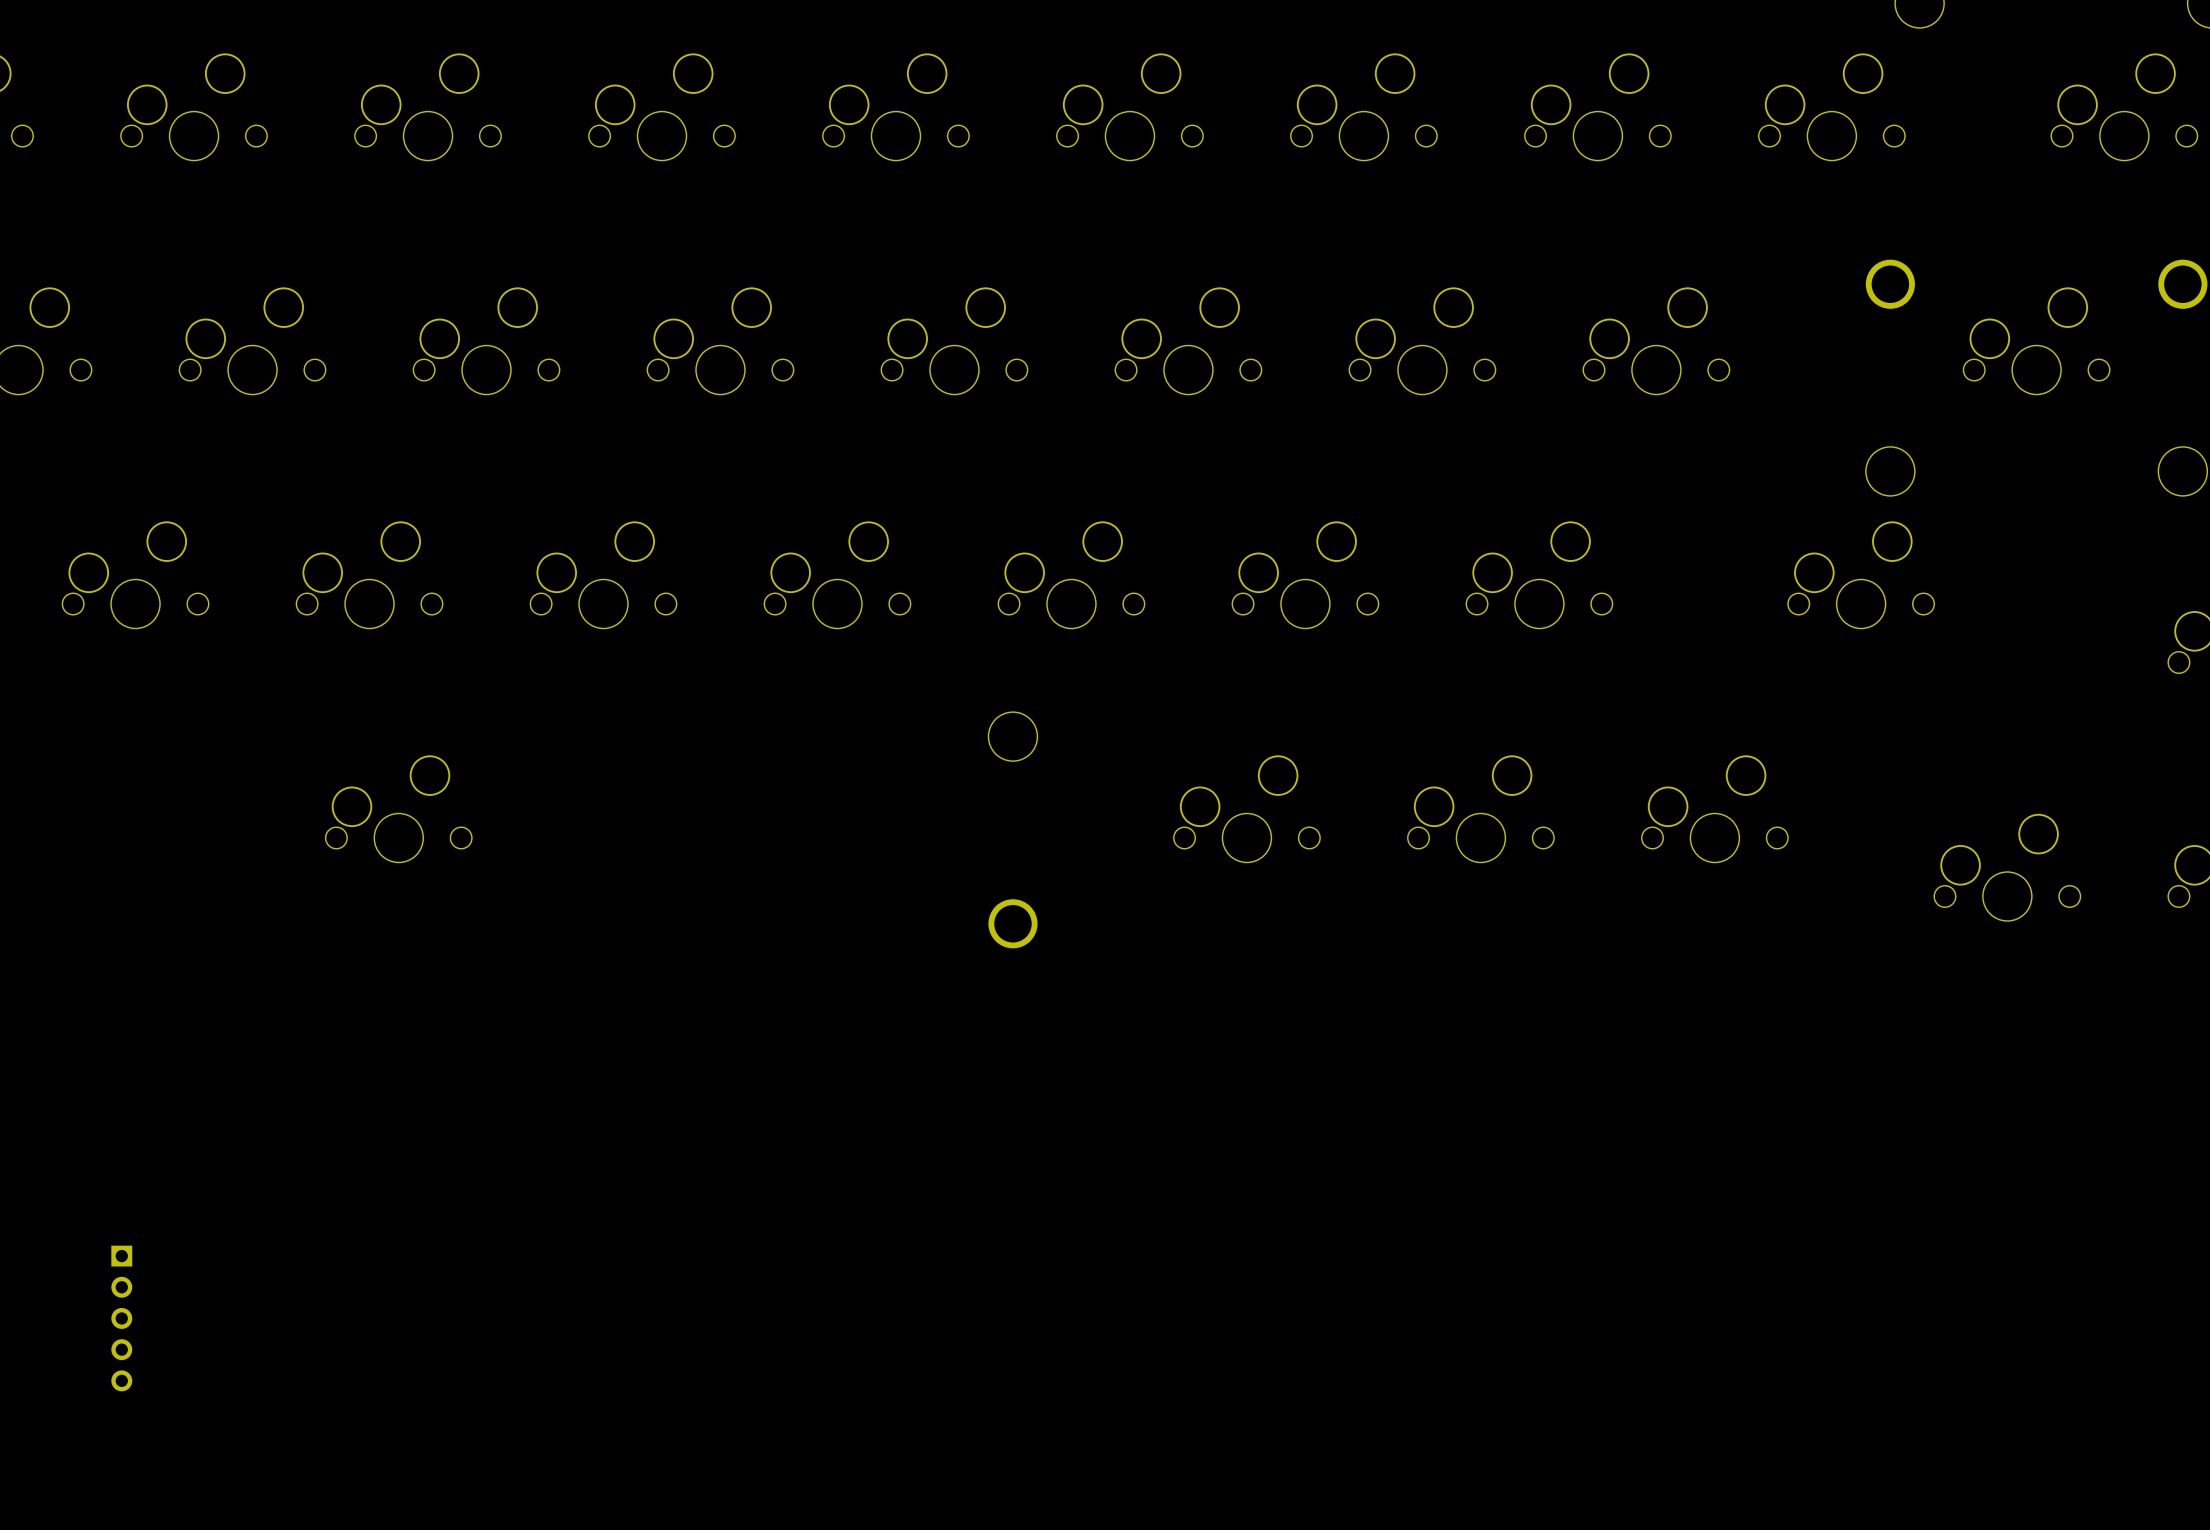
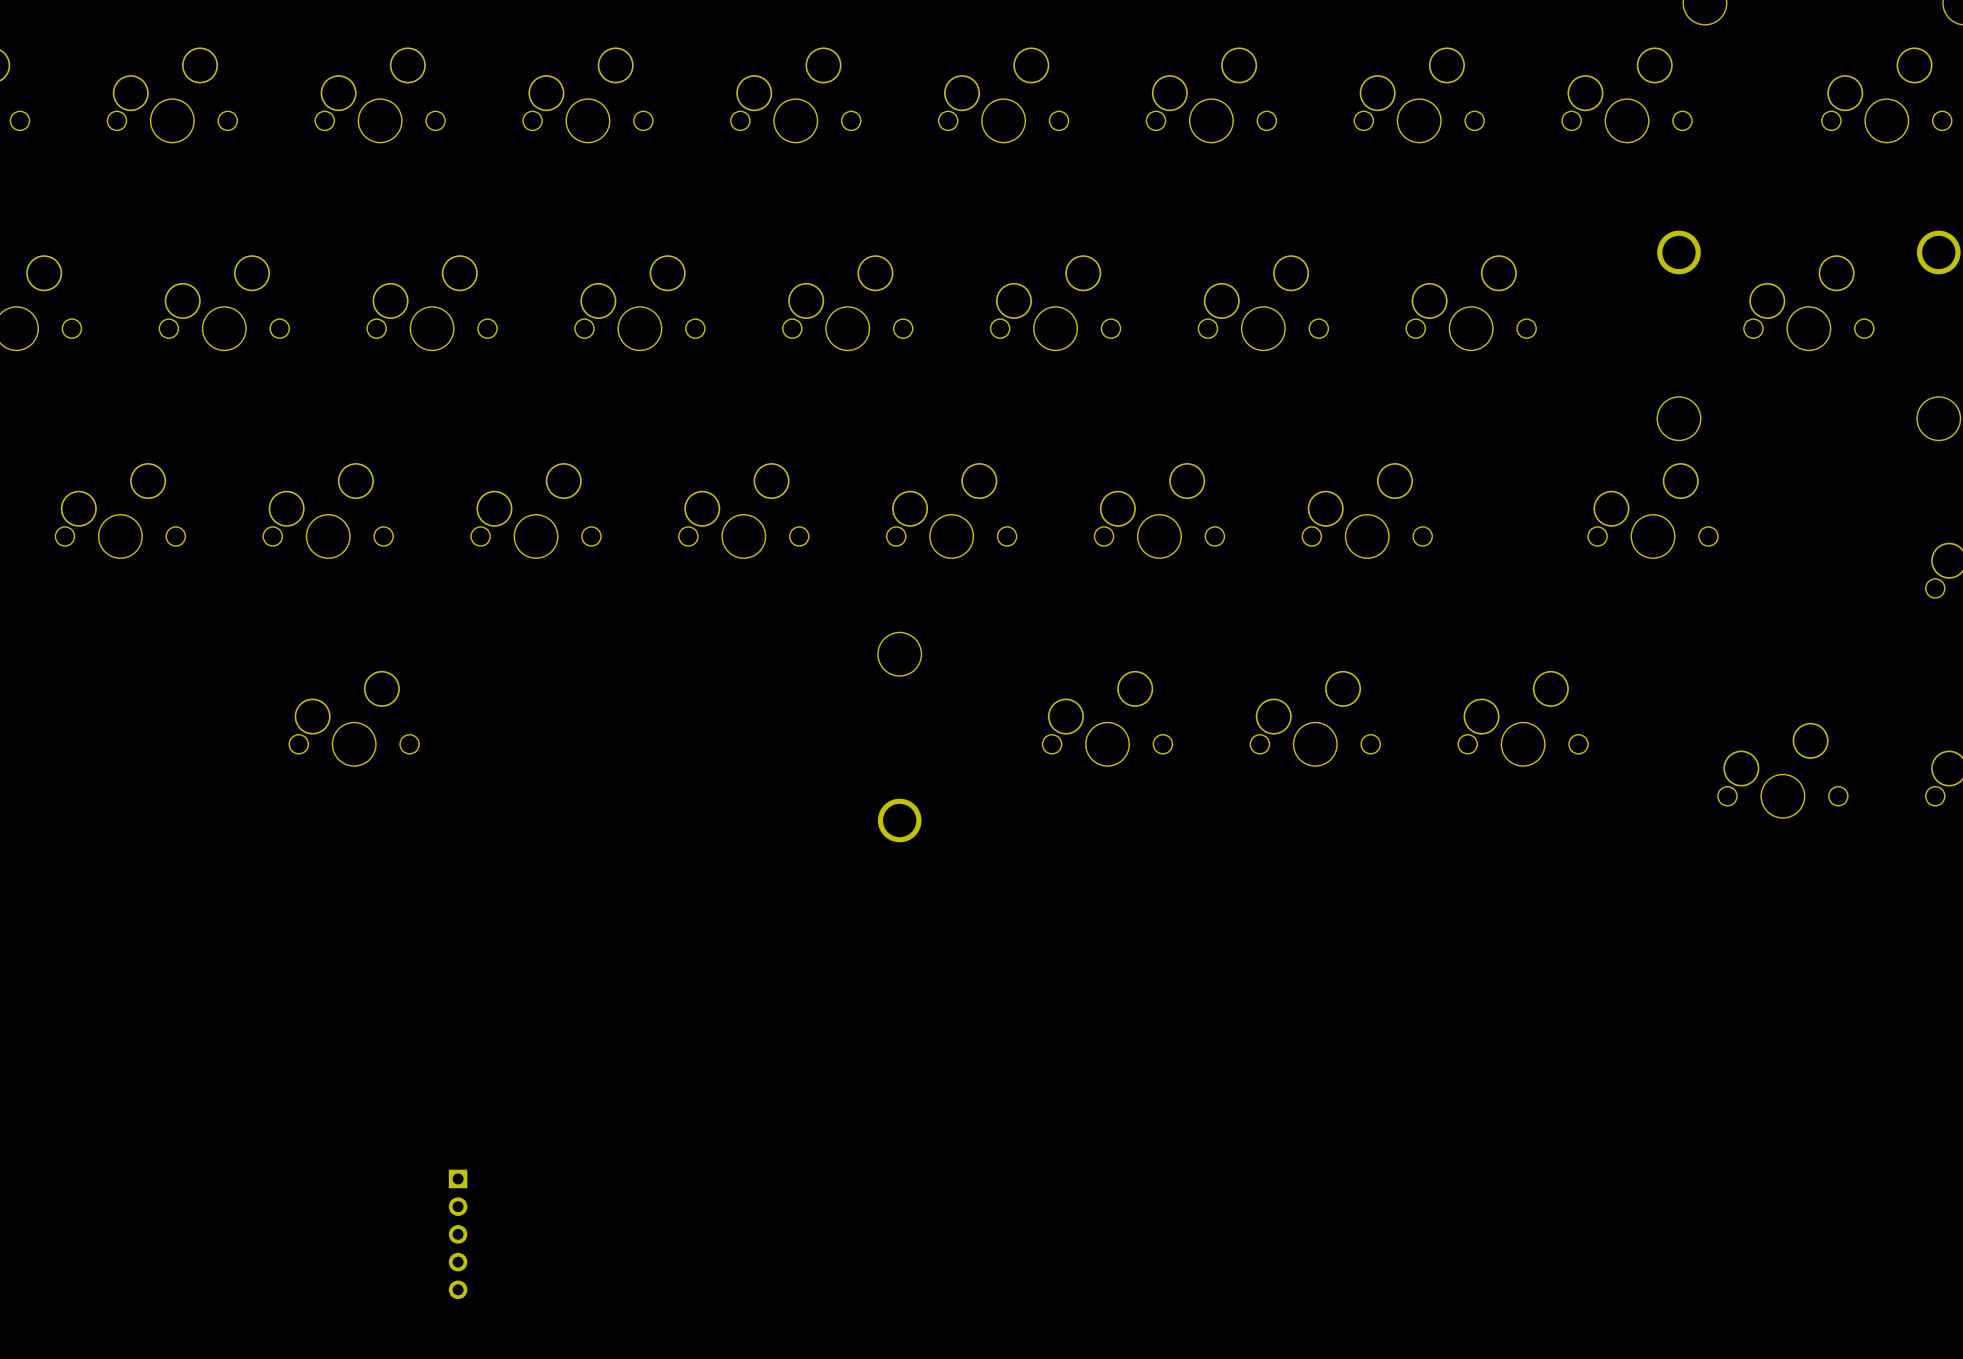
part: (121, 1318) -> none
part: none -> (458, 1234)

